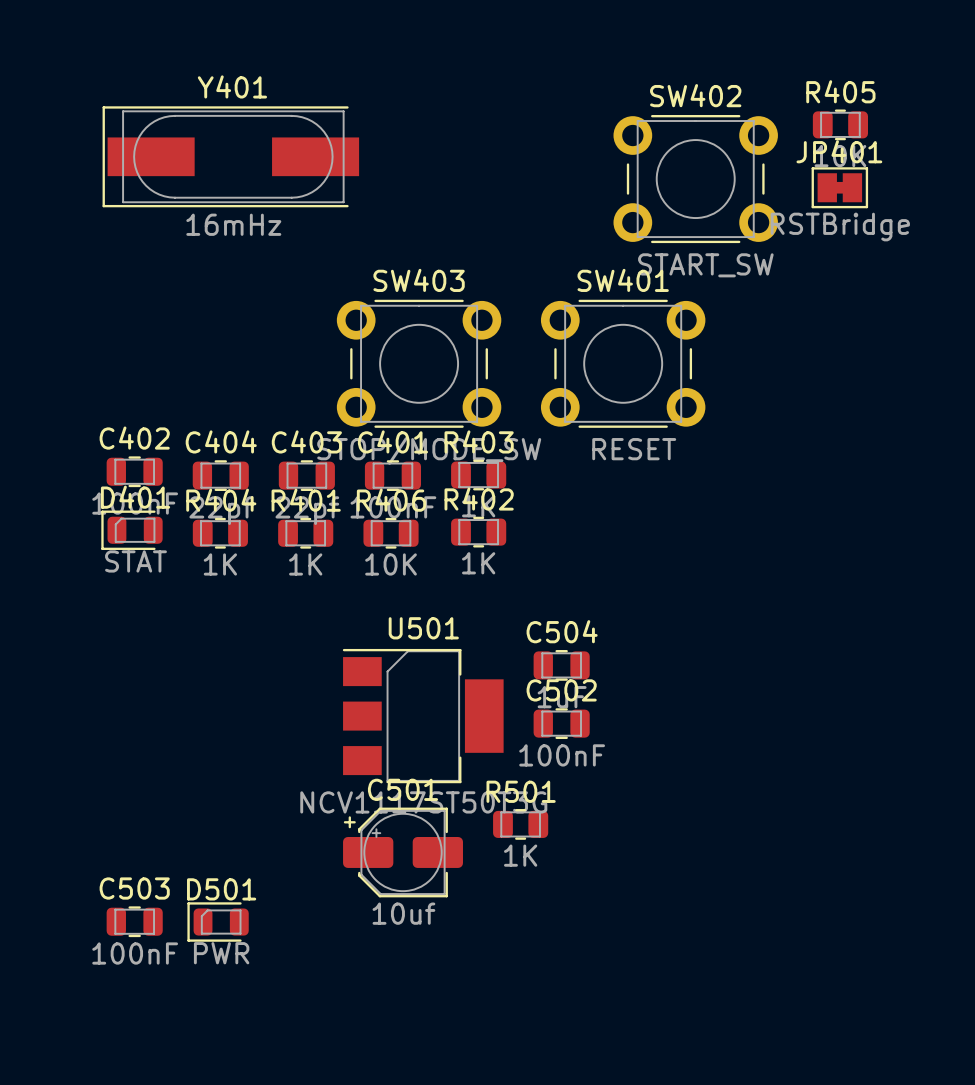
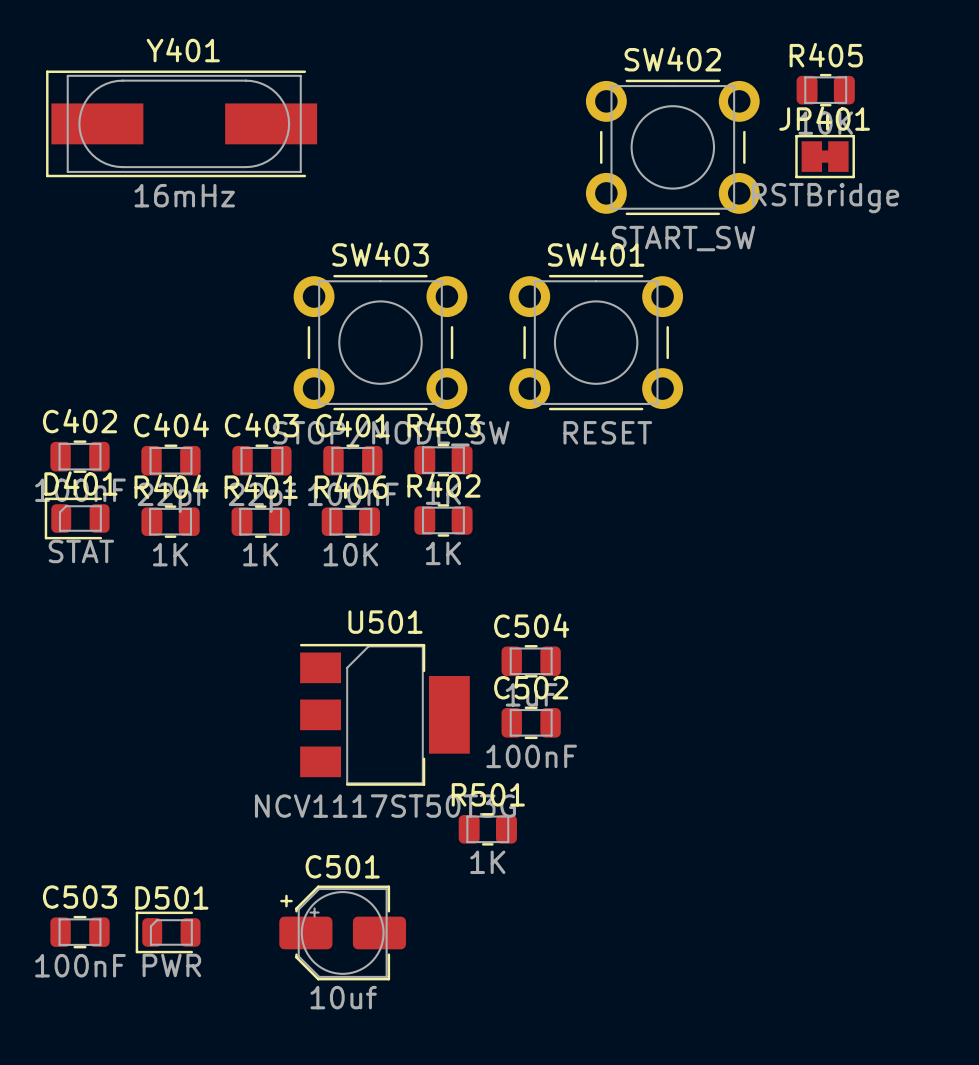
C501 position: (403, 852) -> (342, 932)

